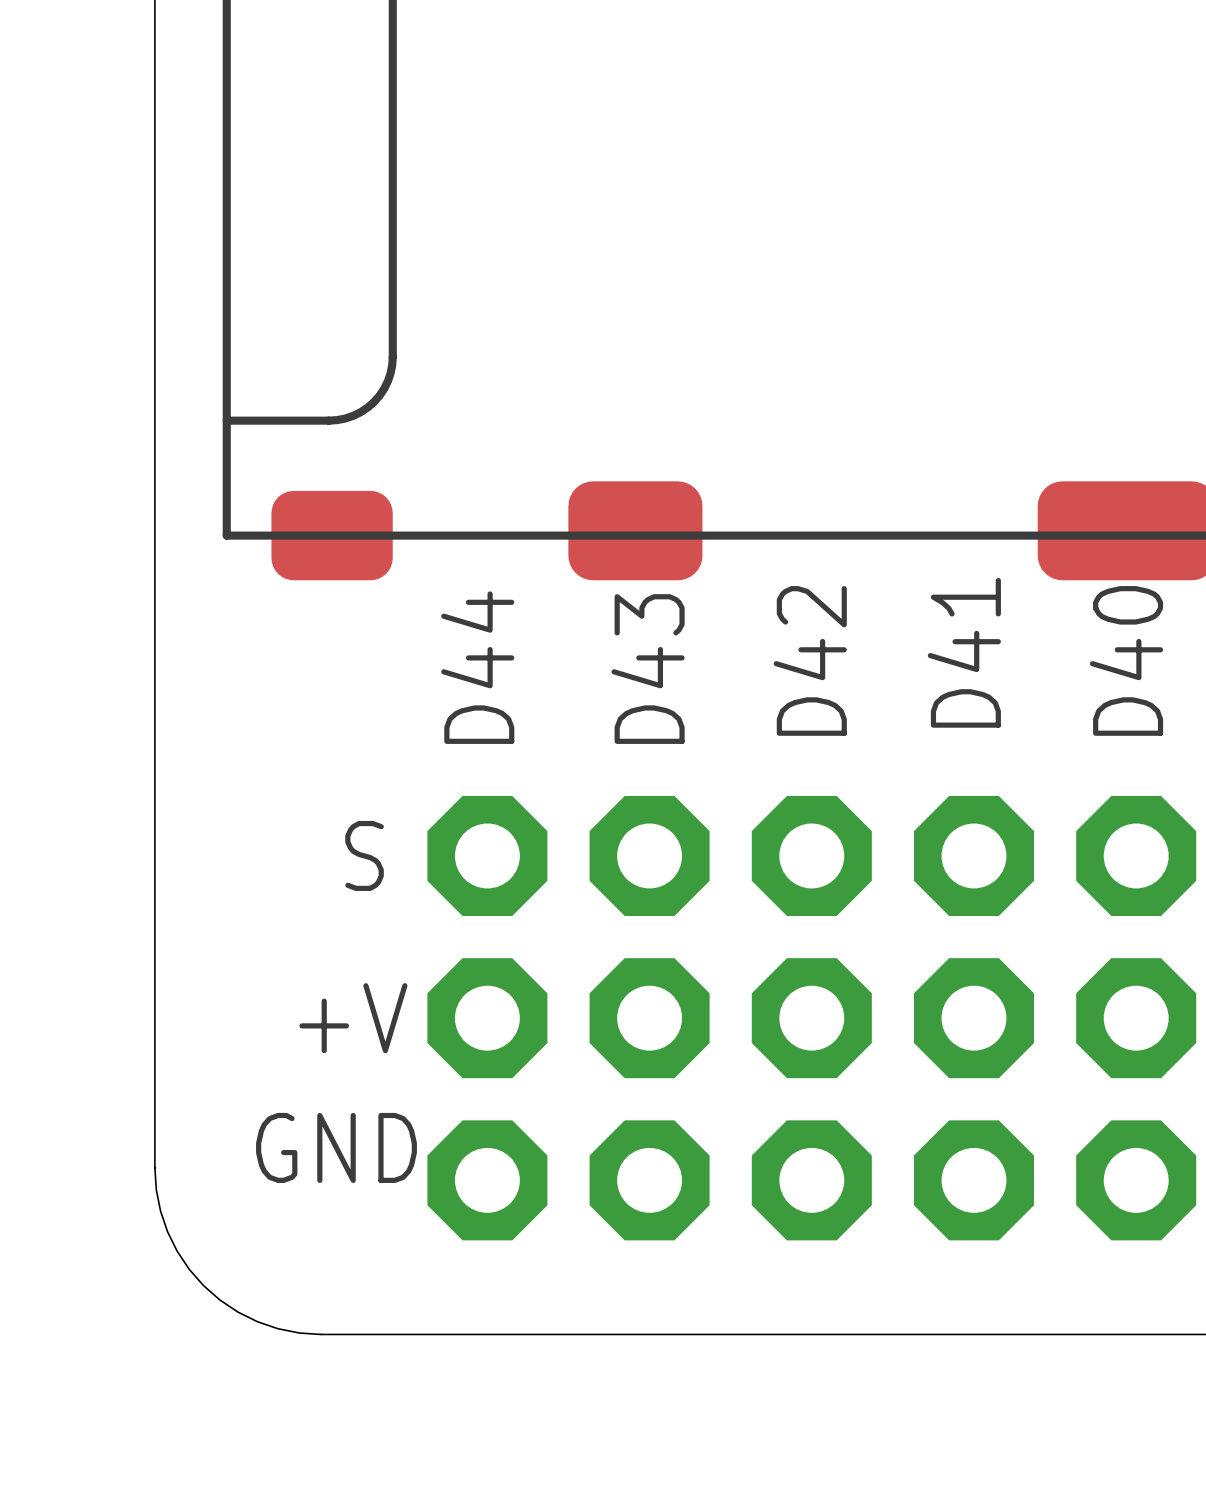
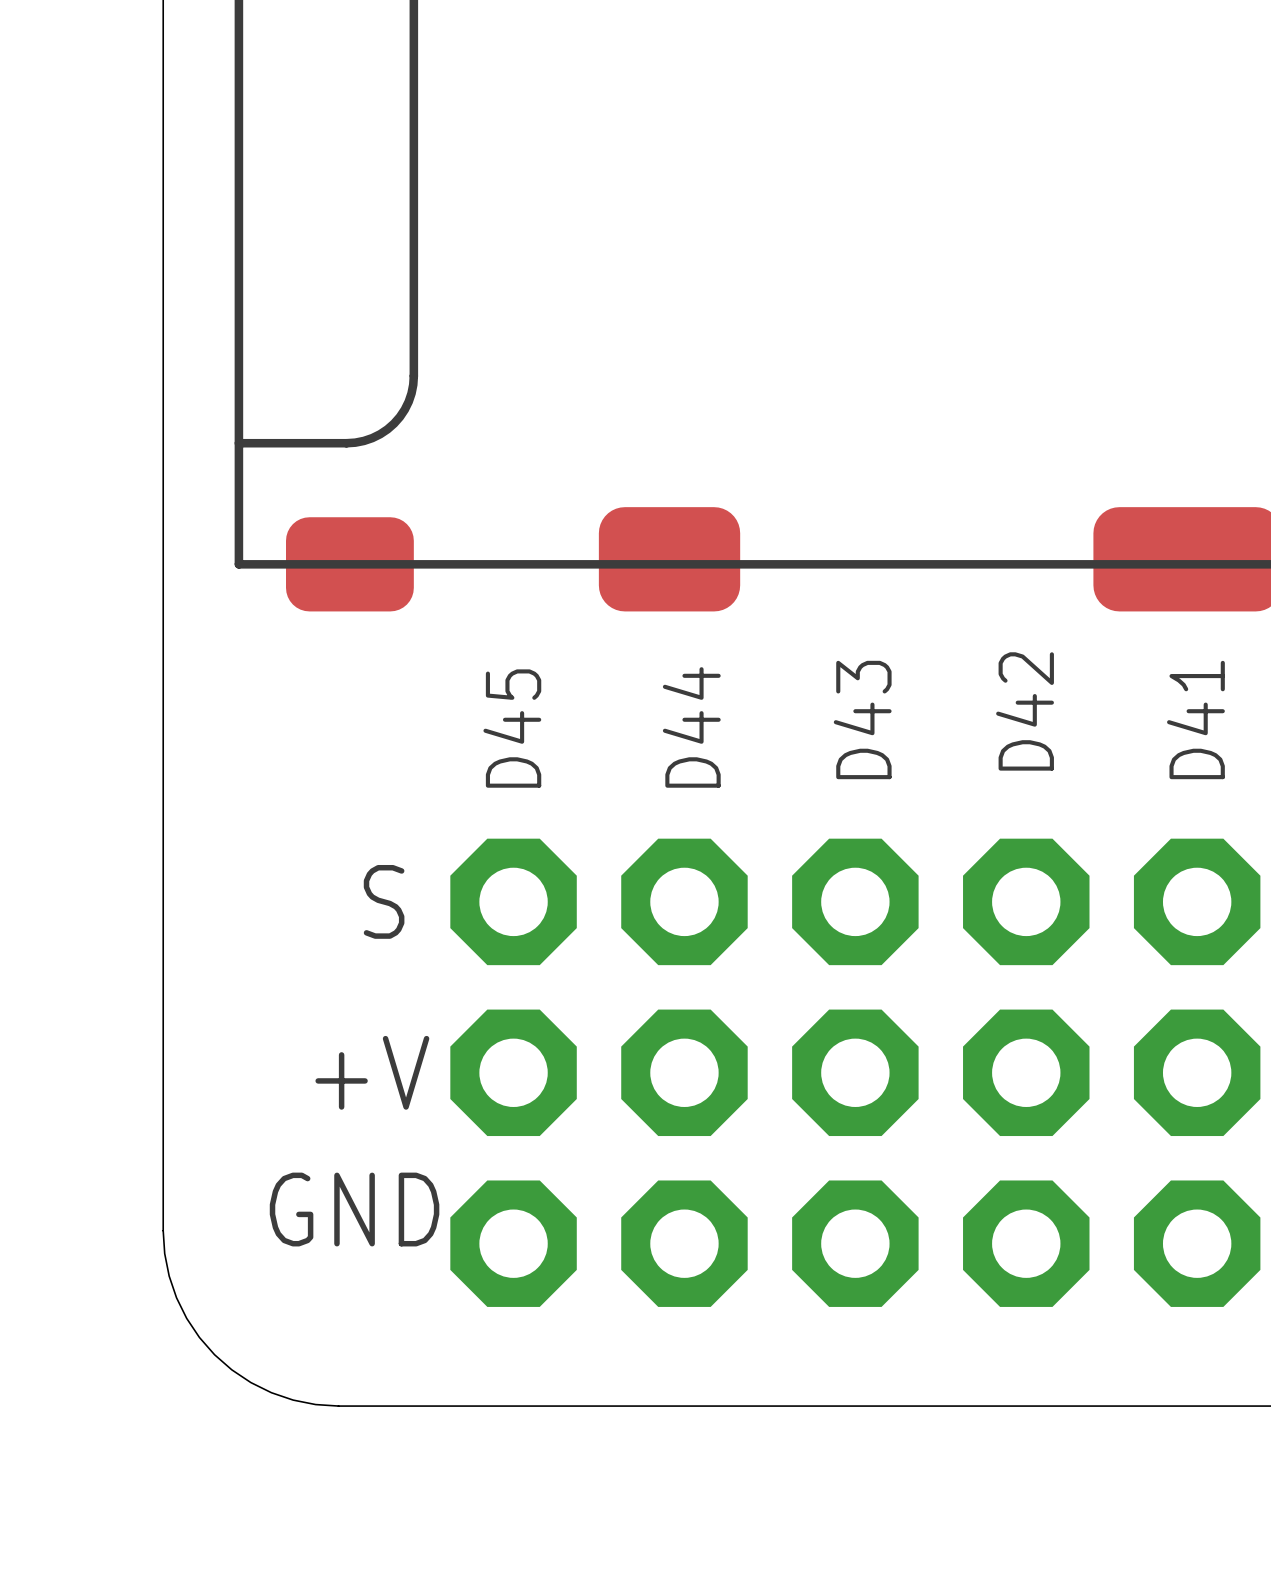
text: D41 (964, 652) -> D42 (1025, 711)
text: D42 (810, 660) -> D43 (862, 720)
text: D40 (1126, 660) -> D41 (1195, 720)
text: D44 (477, 667) -> D45 (512, 728)
text: D43 (648, 669) -> D44 (691, 727)

